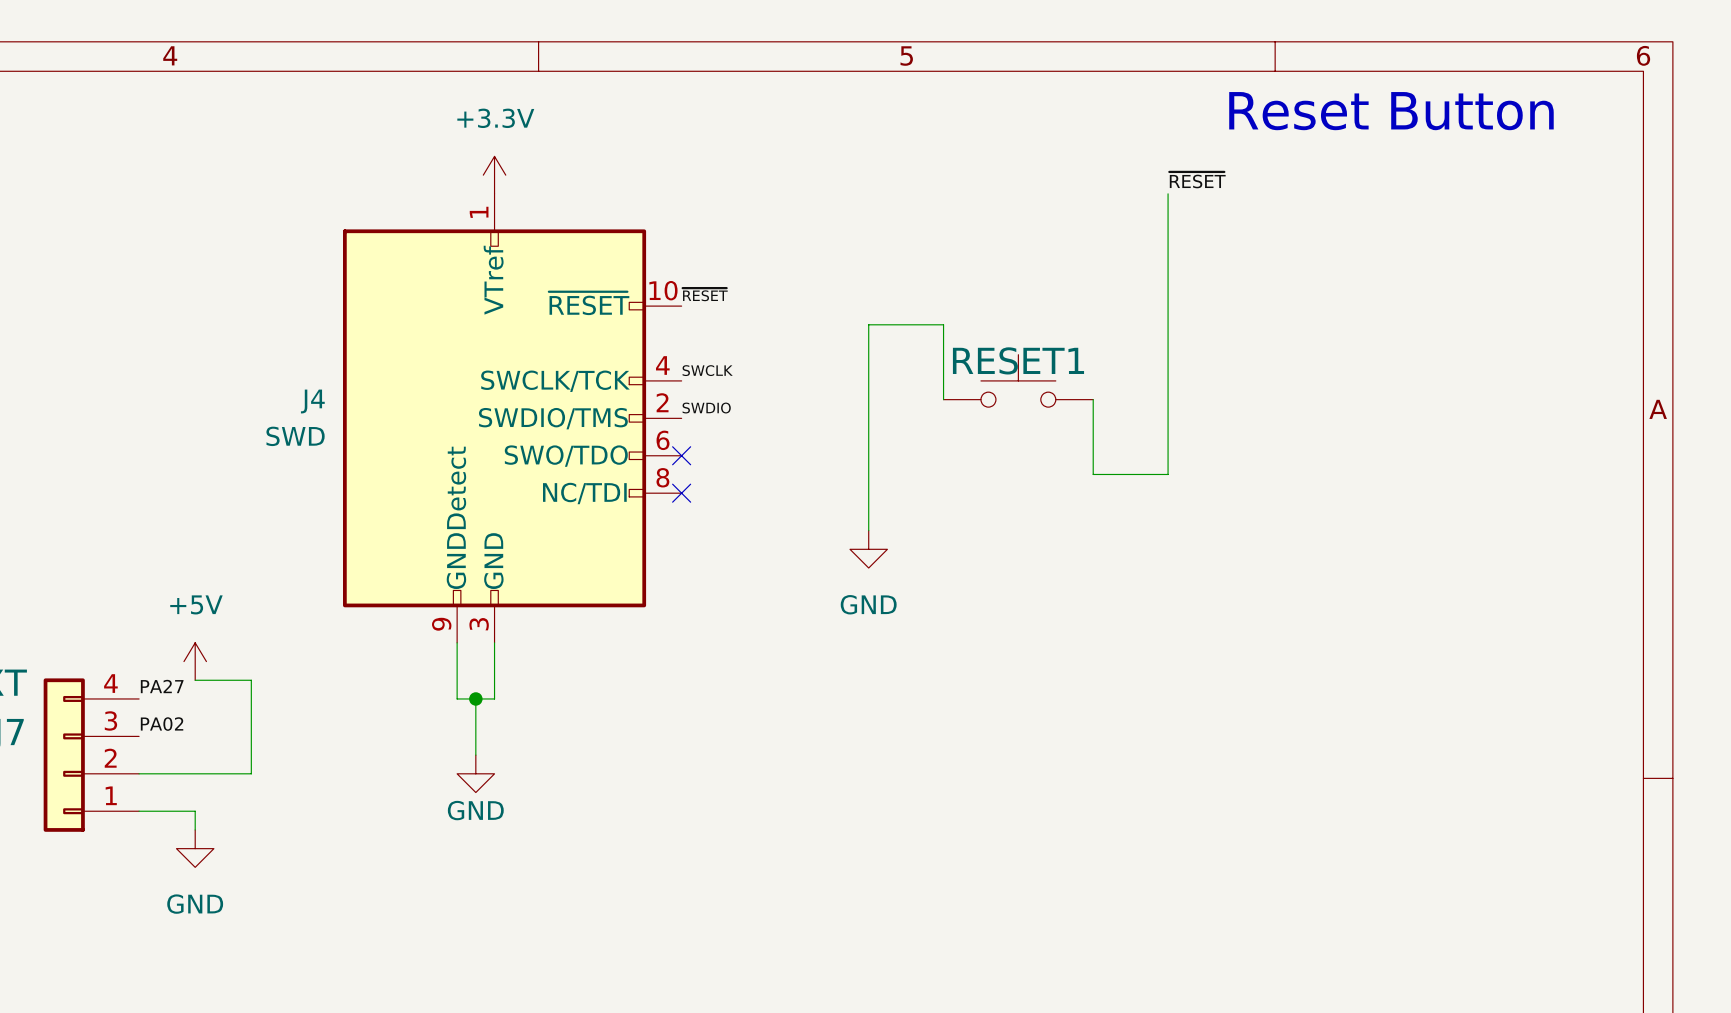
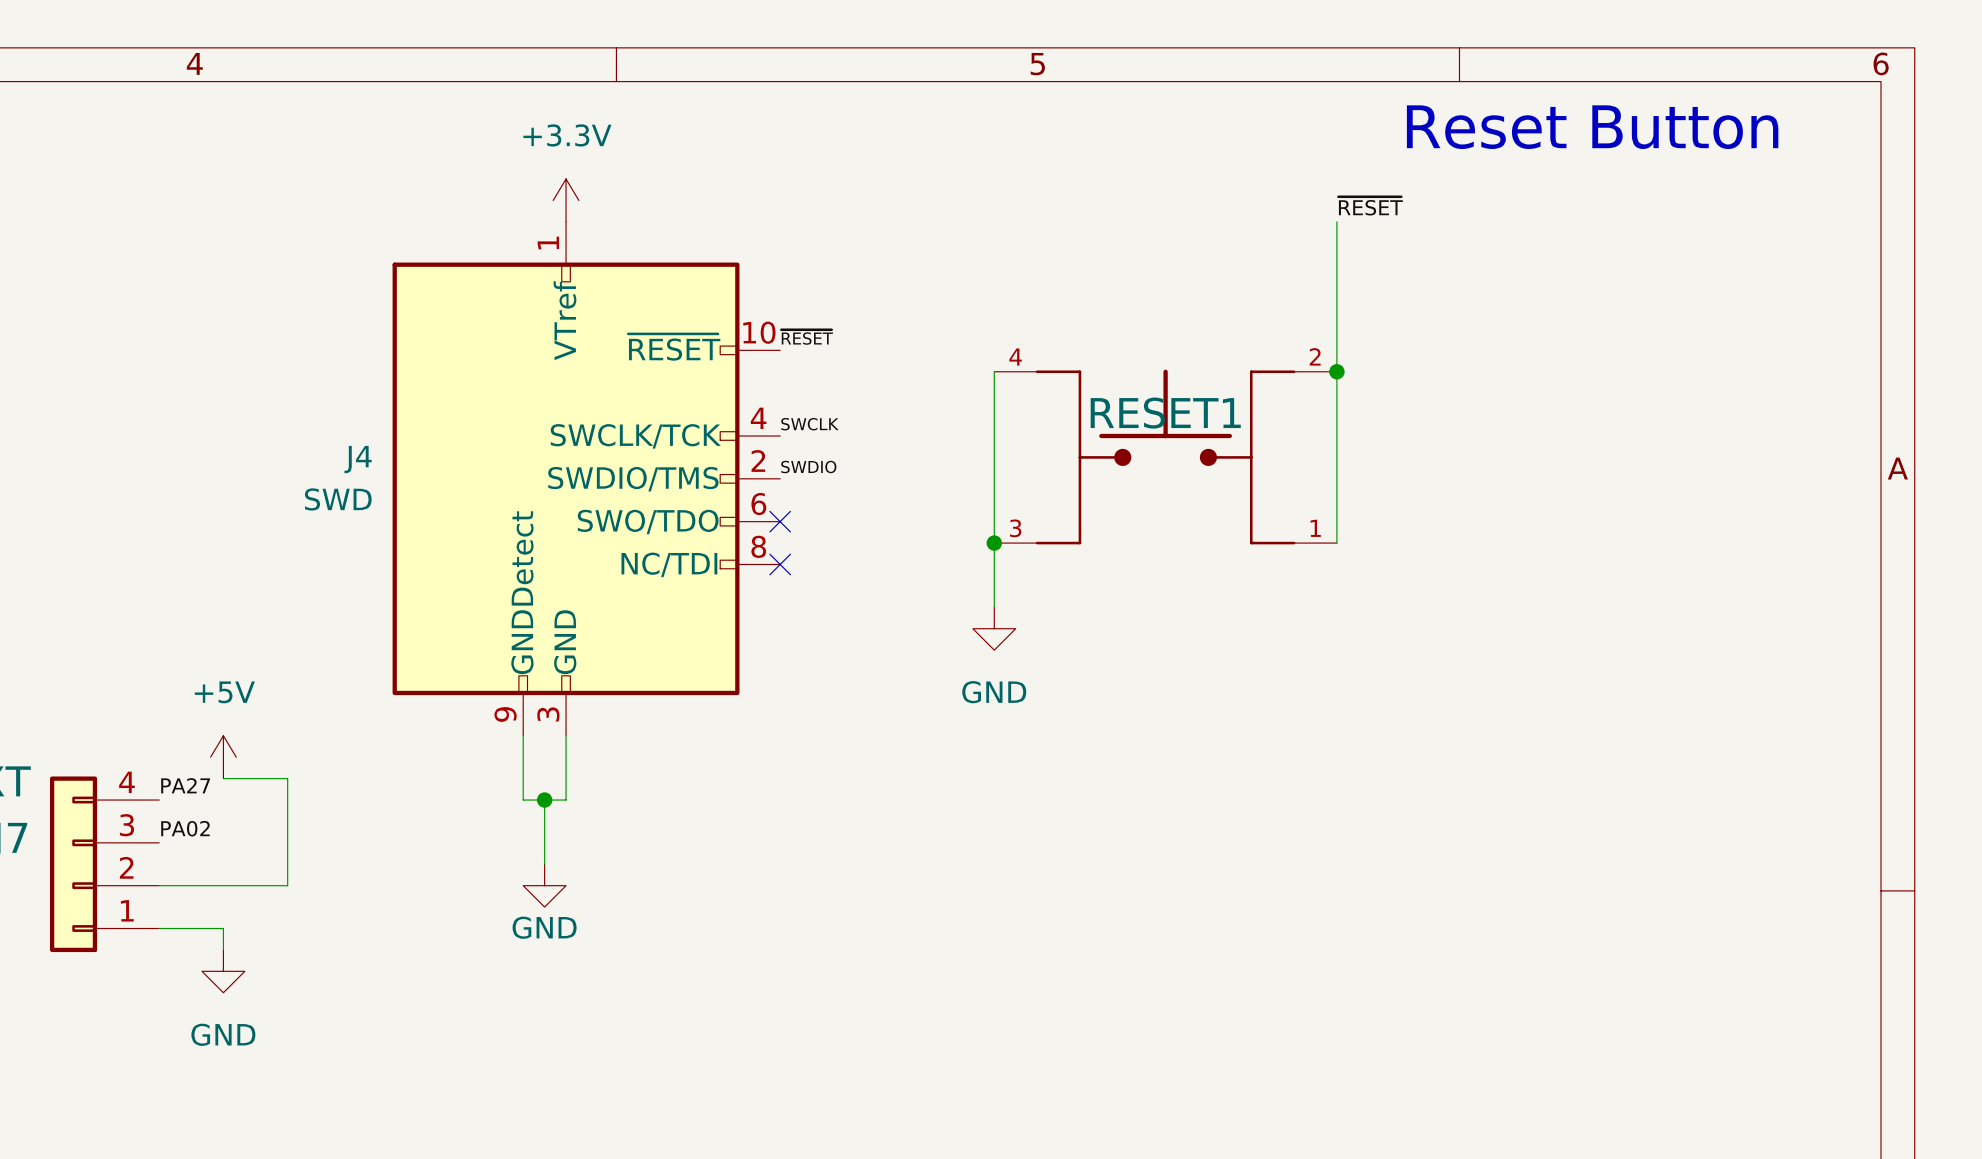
junction: none -> (1336, 371)
RESET1 symbol: [943, 354, 1094, 408] -> [994, 369, 1337, 545]
junction: none -> (994, 543)

